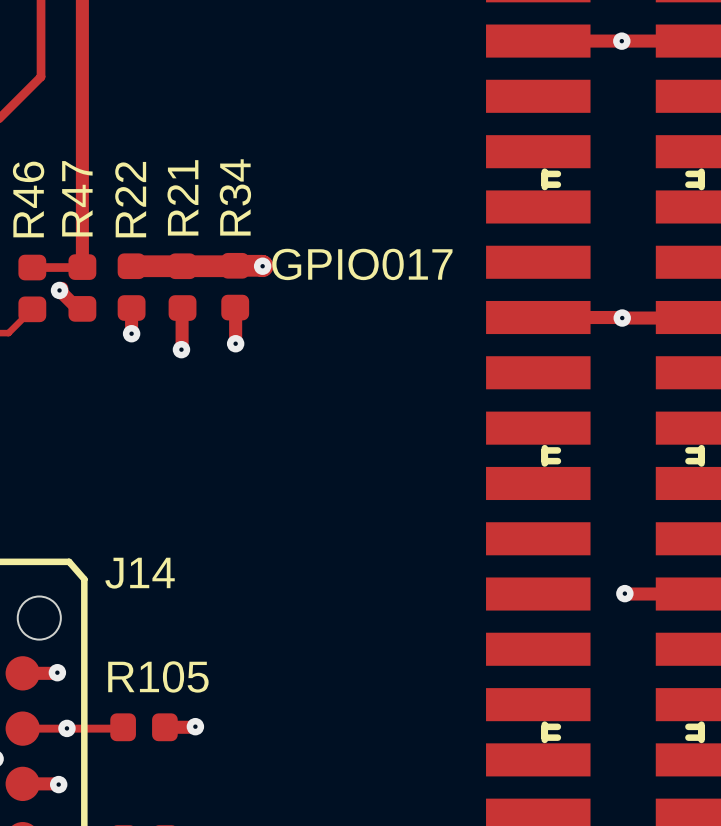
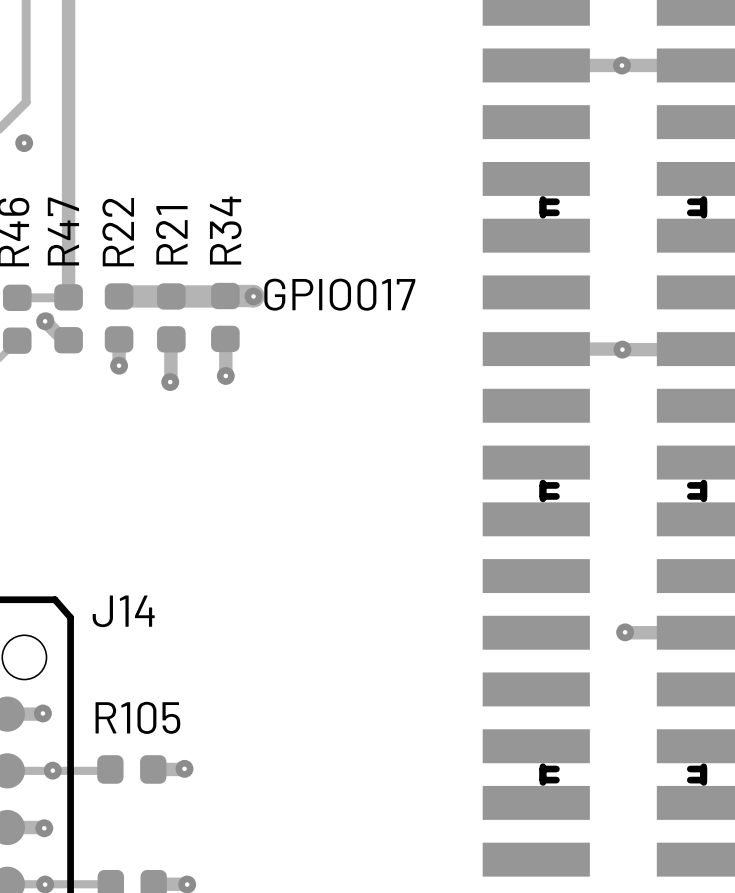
via: none -> (24, 143)

